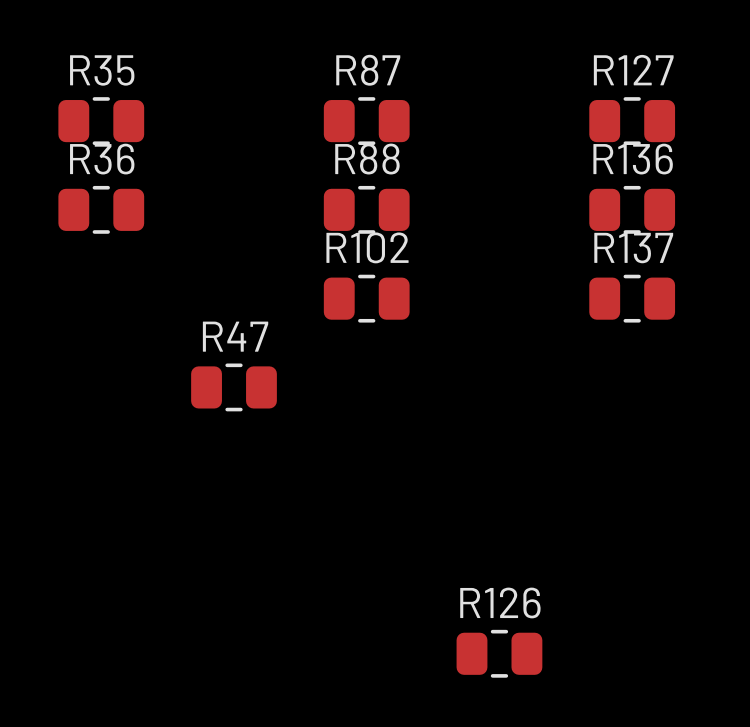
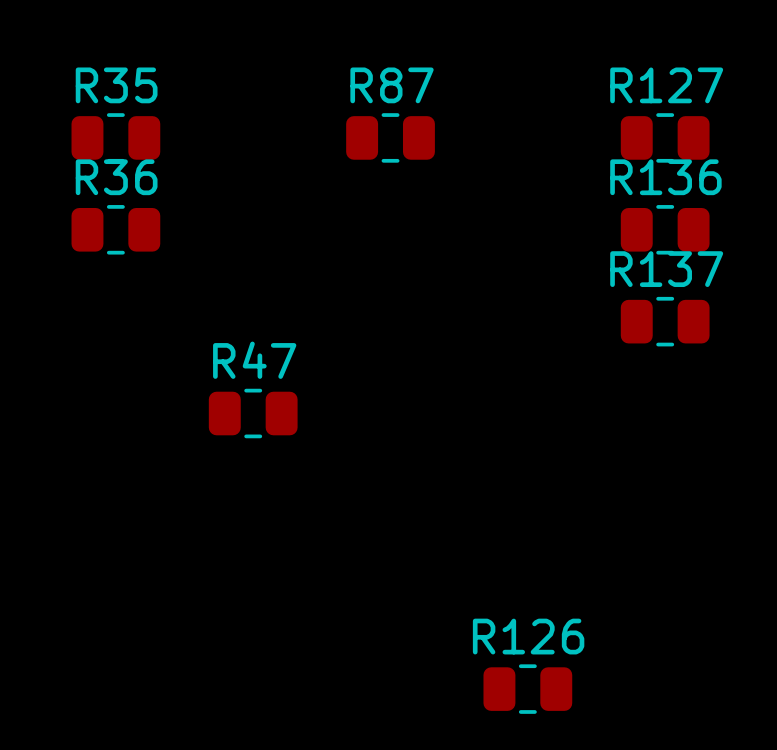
R88: (366, 209) -> none
R102: (366, 298) -> none

